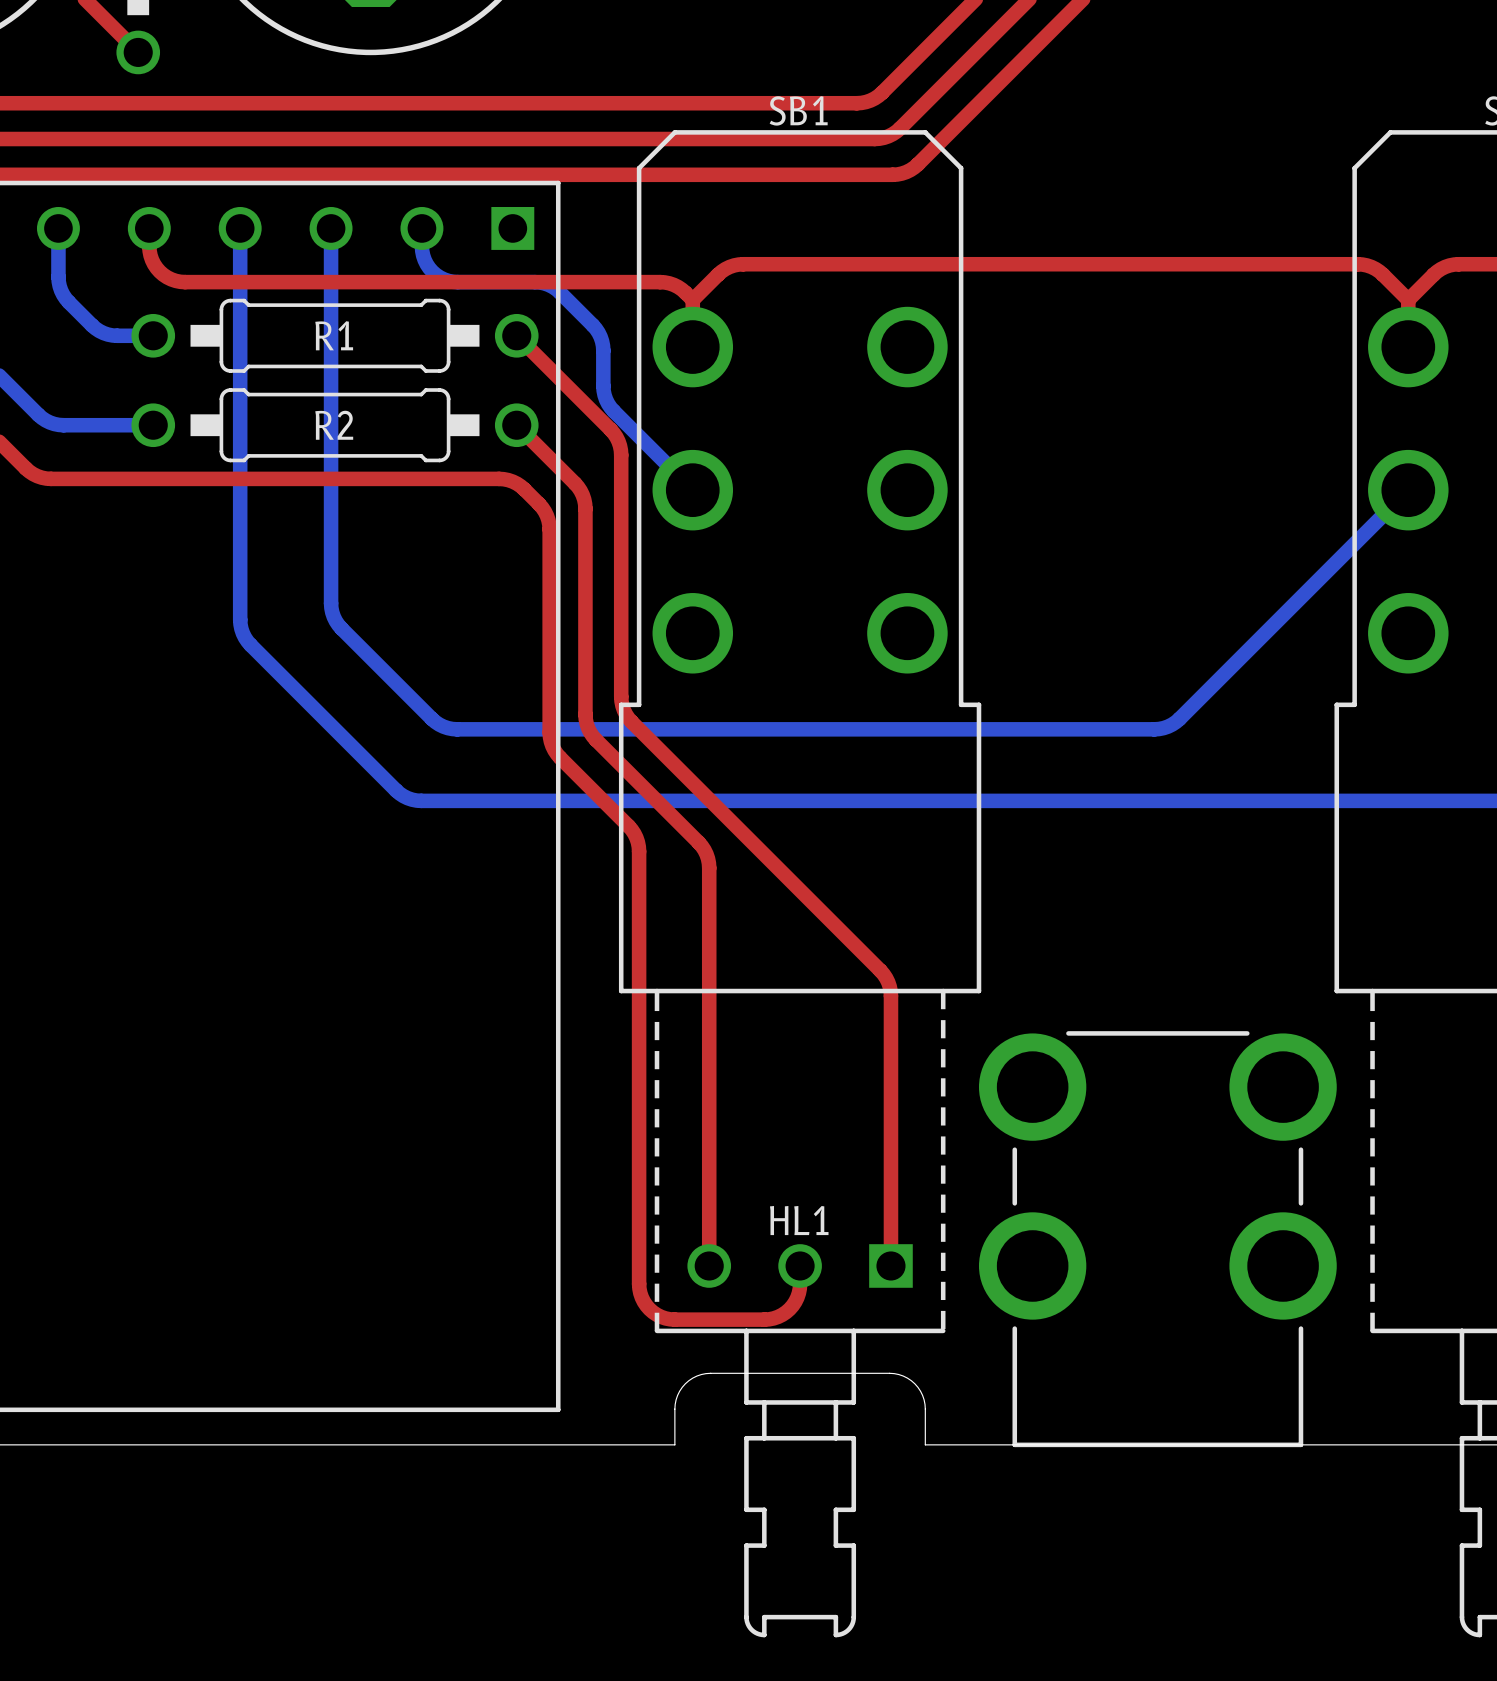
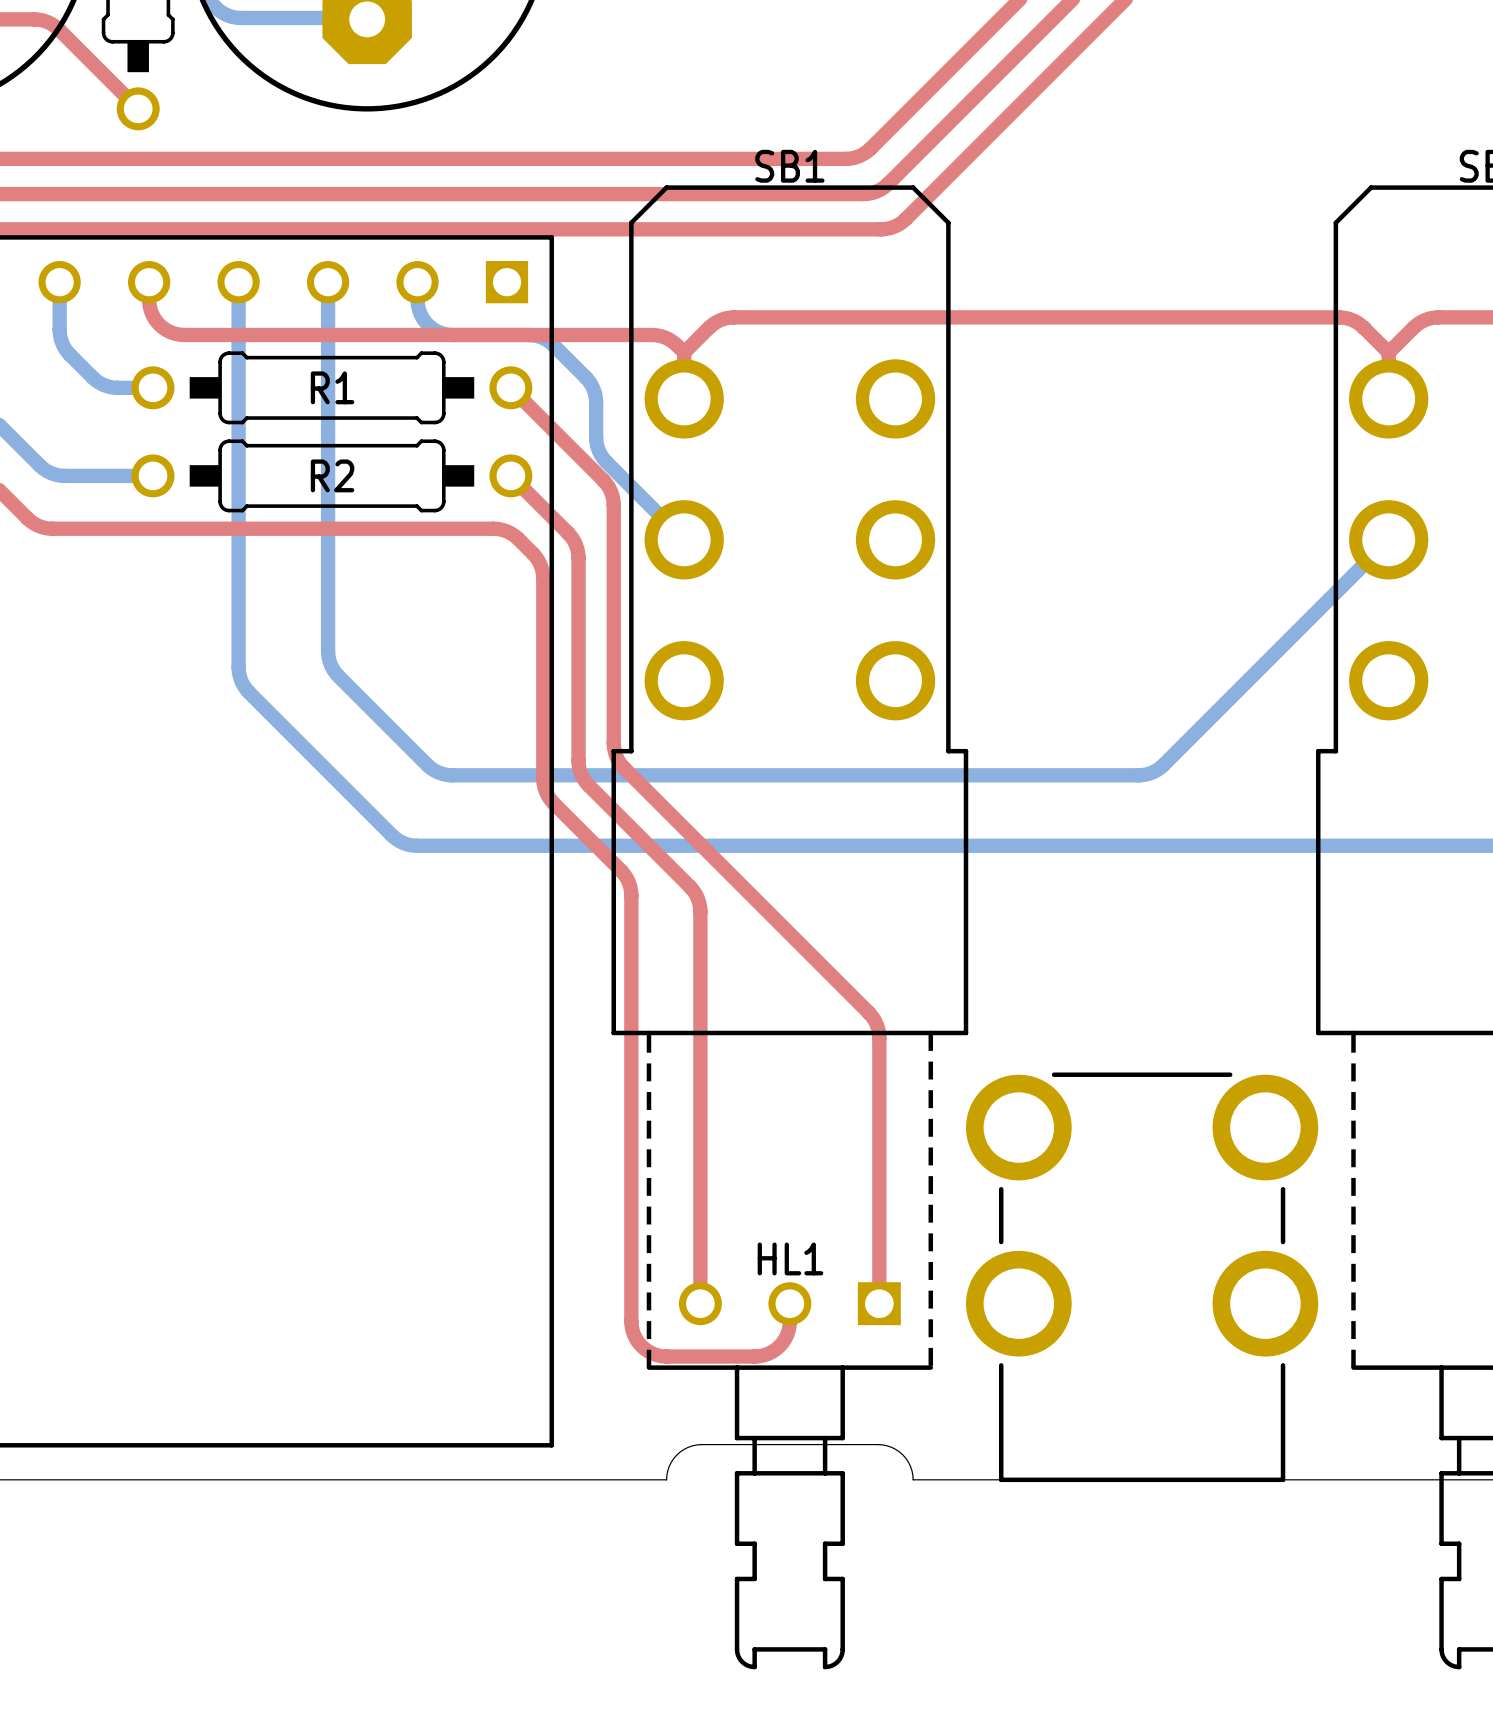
board edge: (674, 1444) (675, 1404) (679, 1391) (692, 1378) (710, 1373) (898, 1374) (911, 1380) (922, 1395) (925, 1409) (925, 1444) -> (666, 1479) (669, 1466) (676, 1454) (688, 1447) (701, 1444) (882, 1444) (895, 1449) (905, 1458) (910, 1466) (913, 1479)

